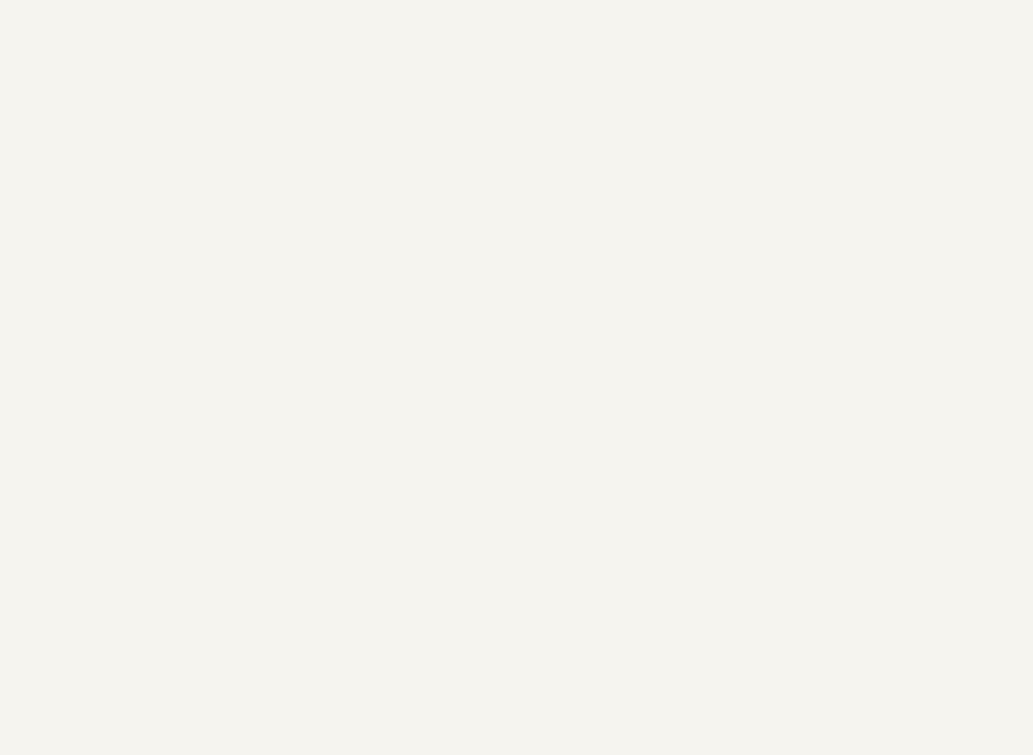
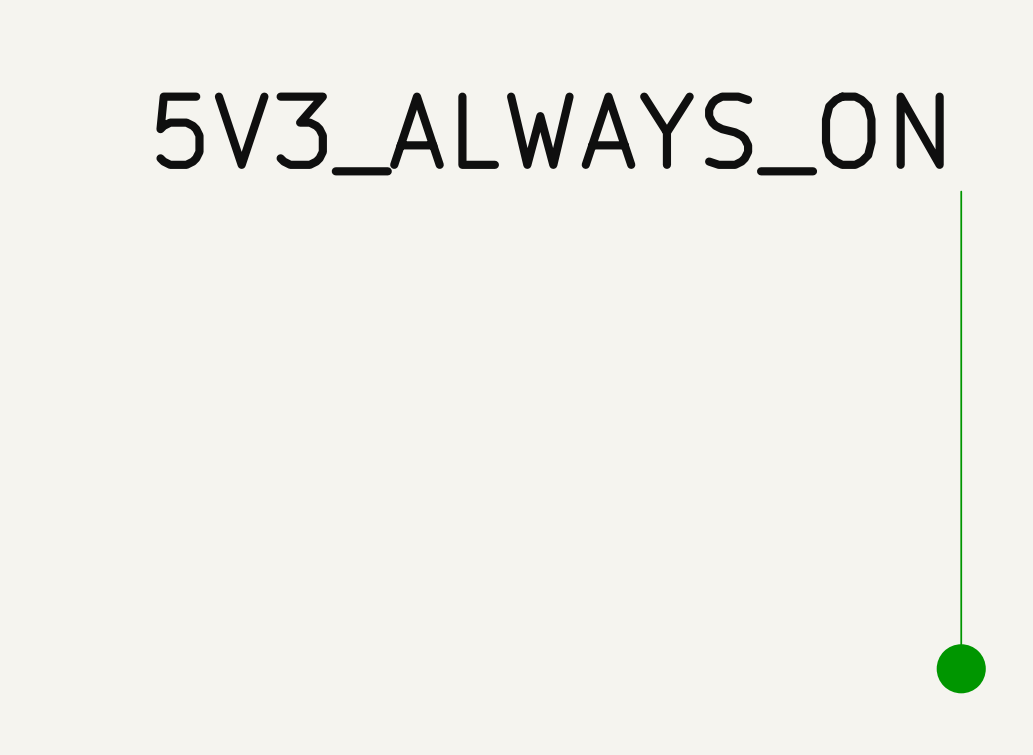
label: none -> 5V3_ALWAYS_ON (550, 133)
wire: none -> (961, 191) (961, 668)
junction: none -> (961, 668)

